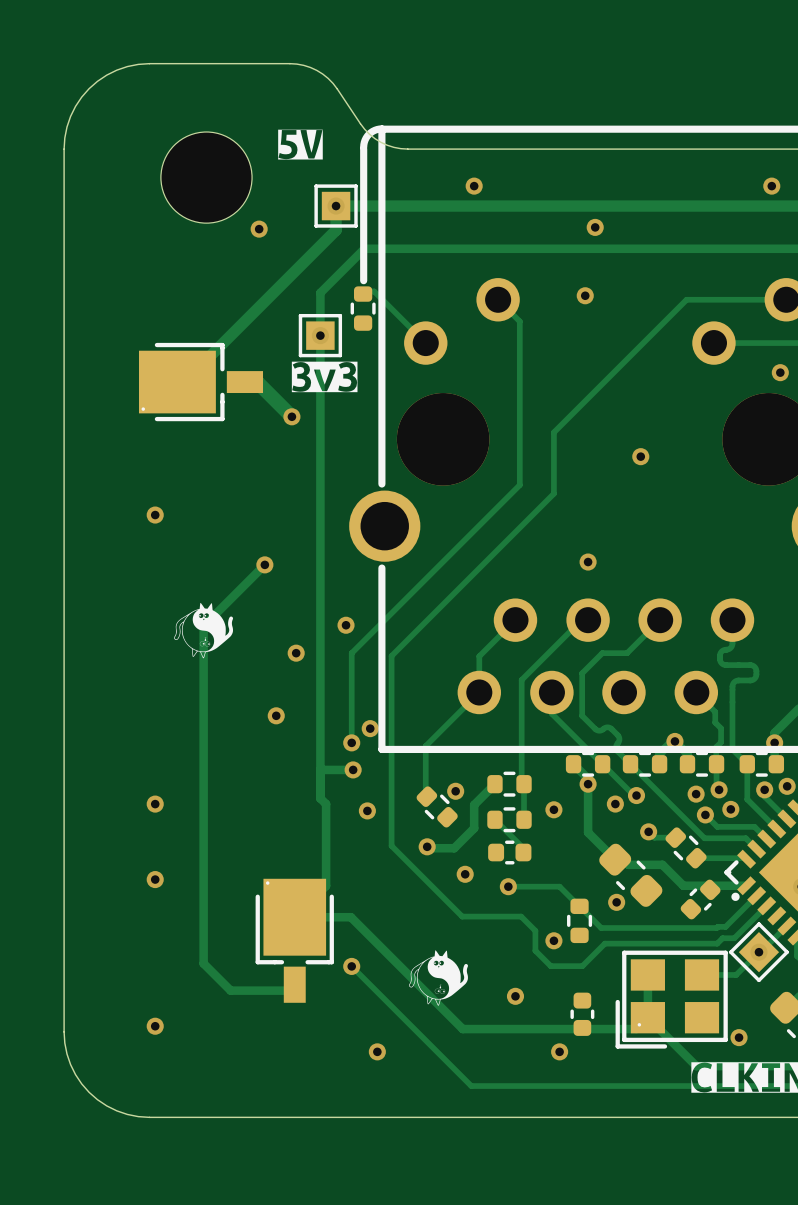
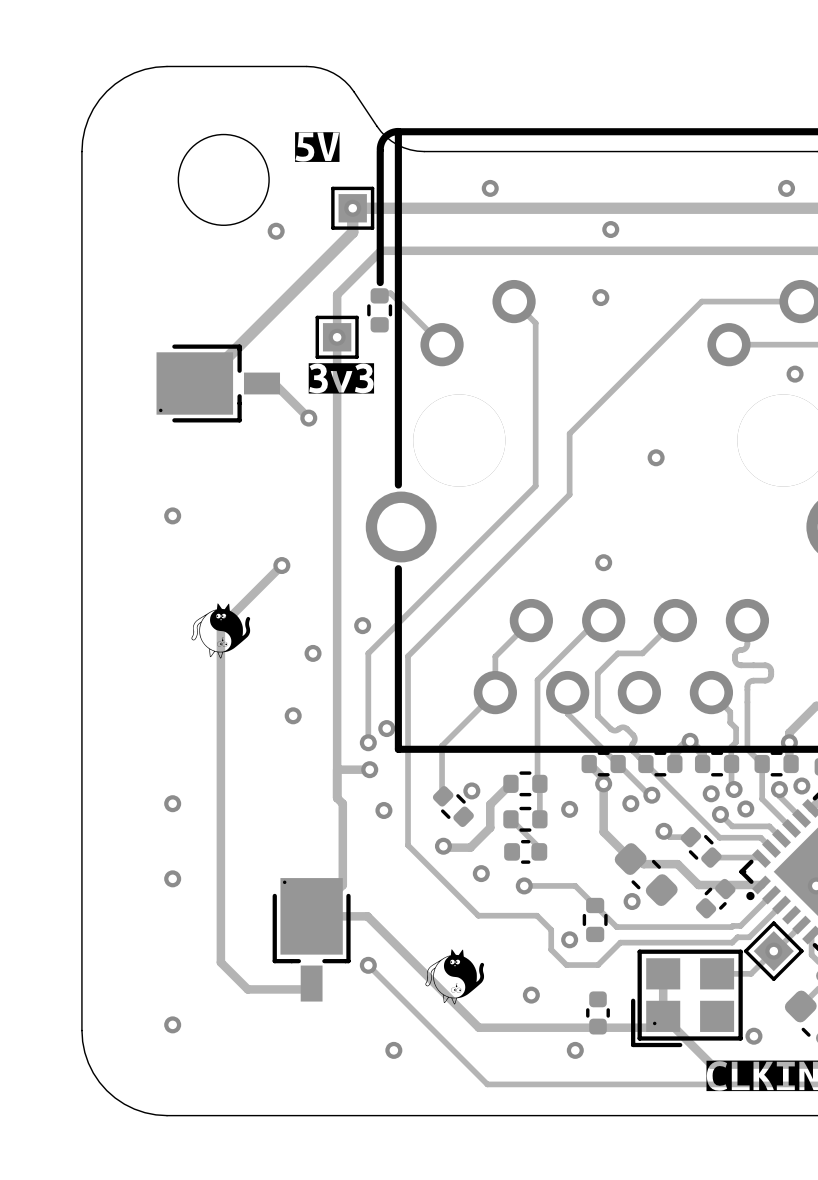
track width: thick (244, 382) (257, 382) (291, 416) -> thin (261, 383) (274, 383) (308, 418)

